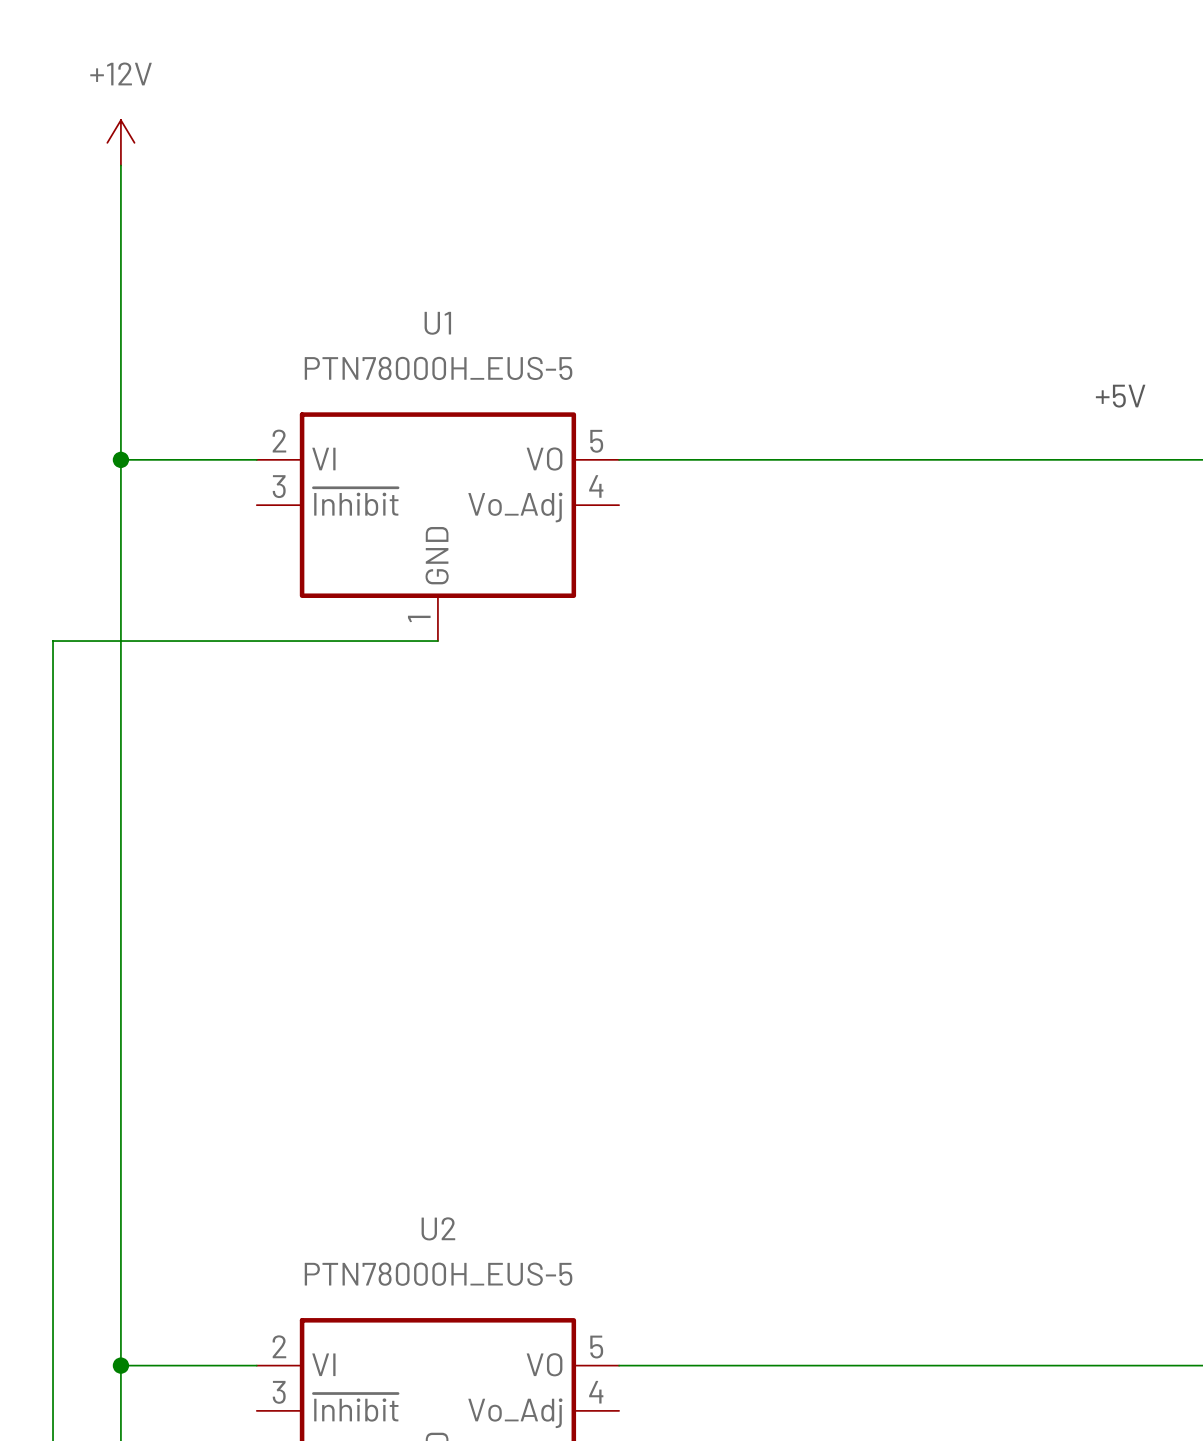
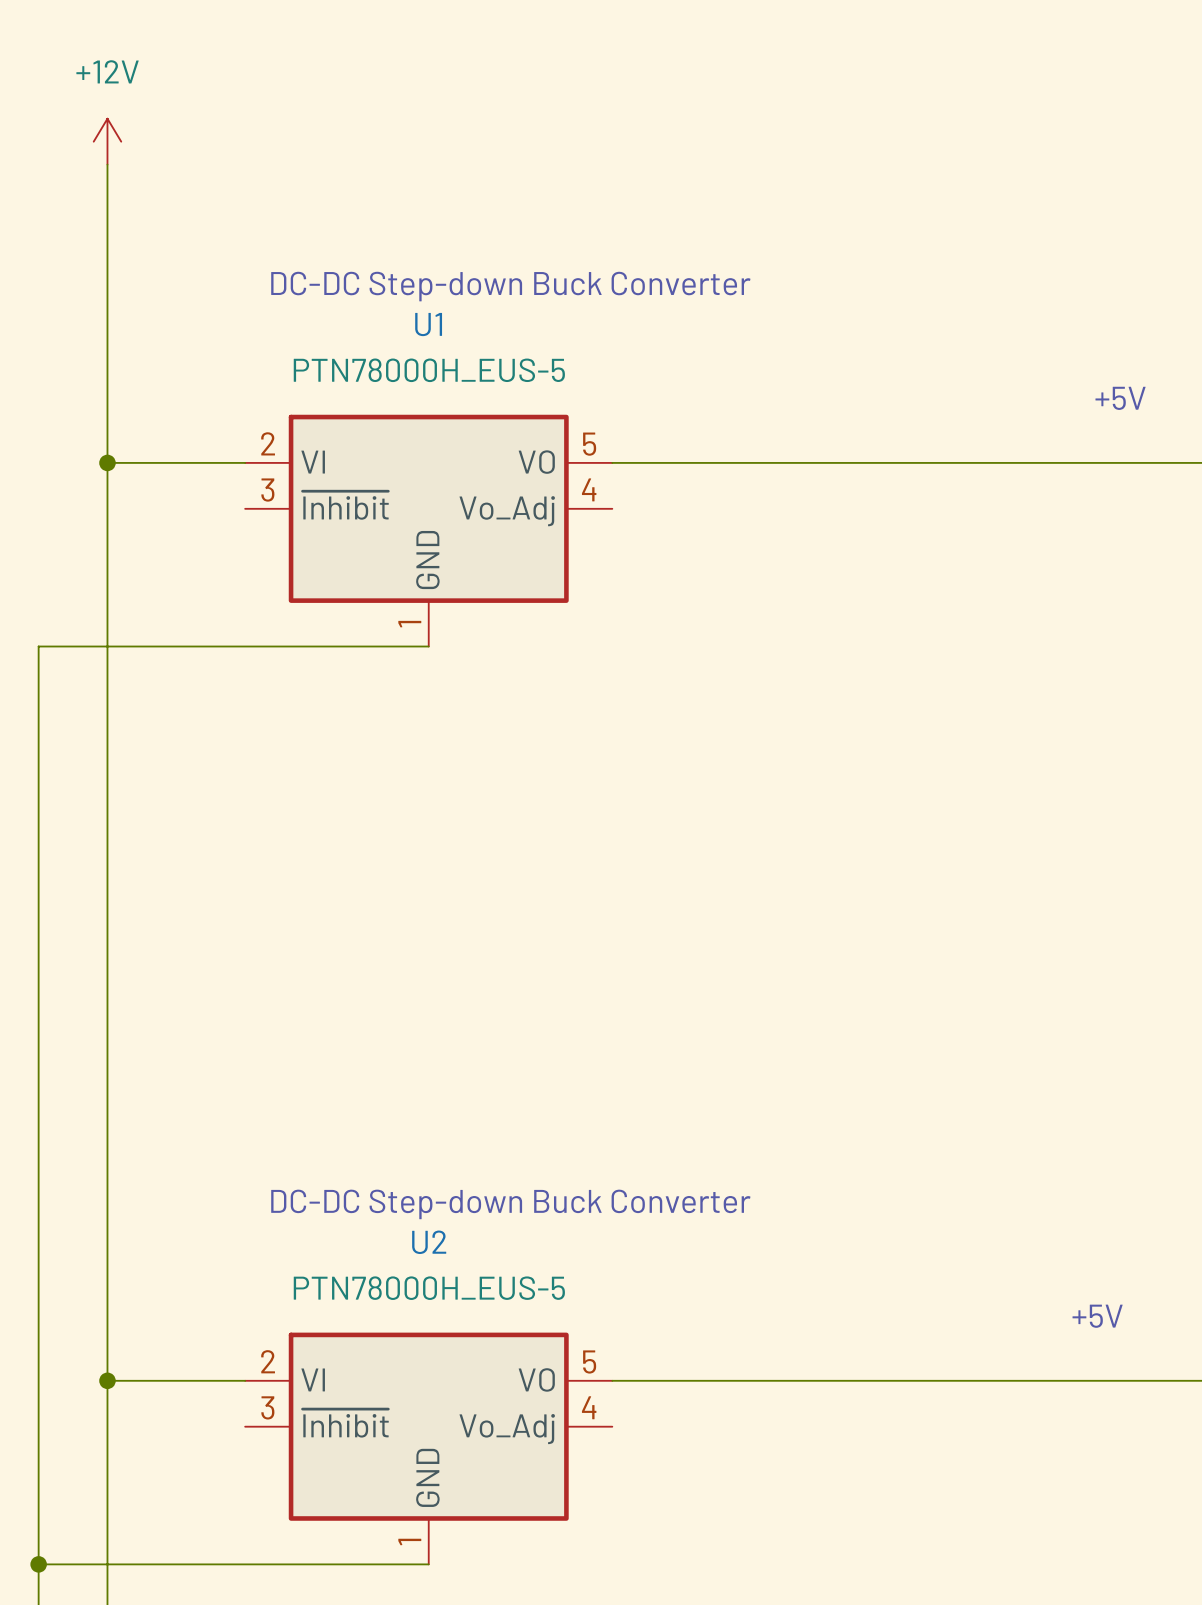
text: none -> DC-DC Step-down Buck Converter (510, 286)
text: none -> DC-DC Step-down Buck Converter (510, 1204)
text: none -> +5V (1097, 1316)

